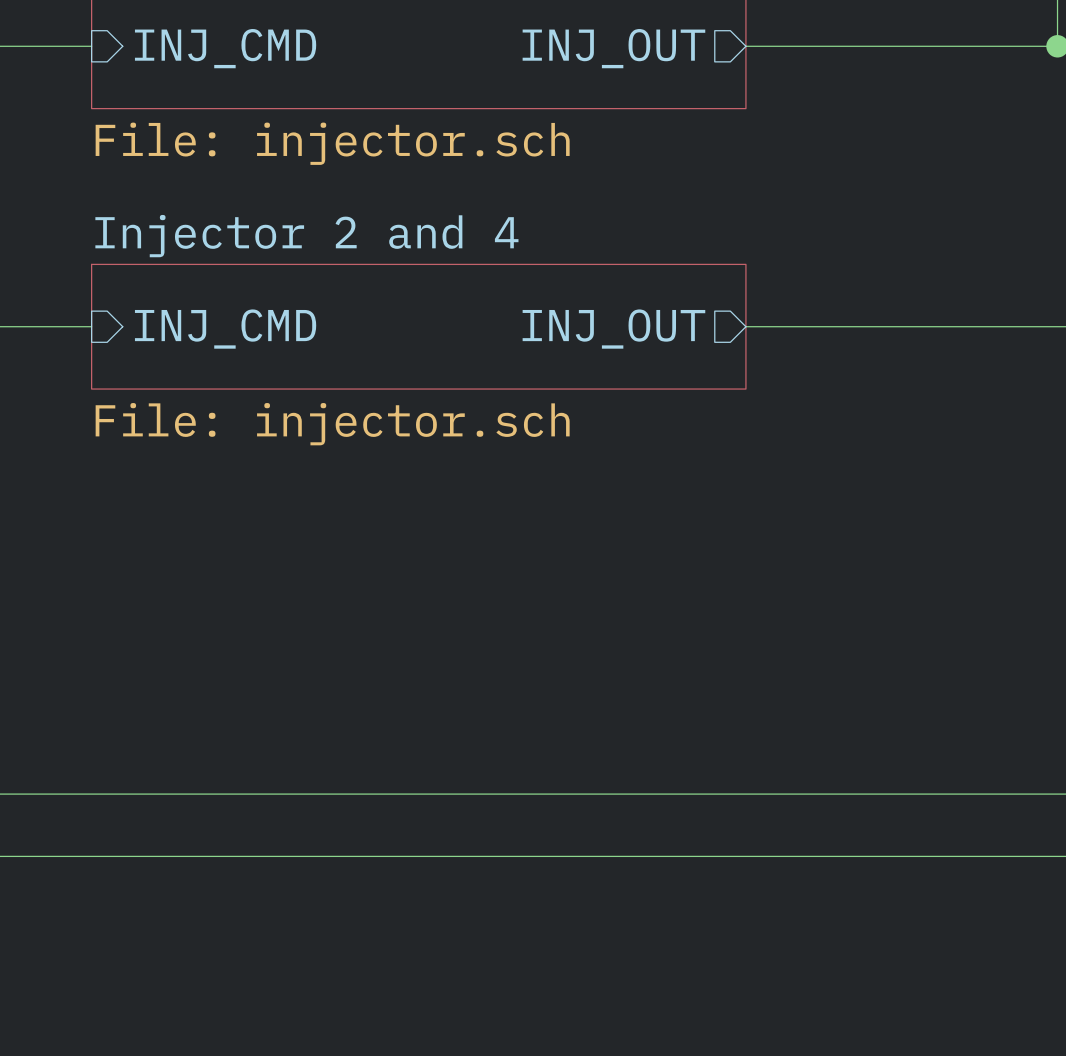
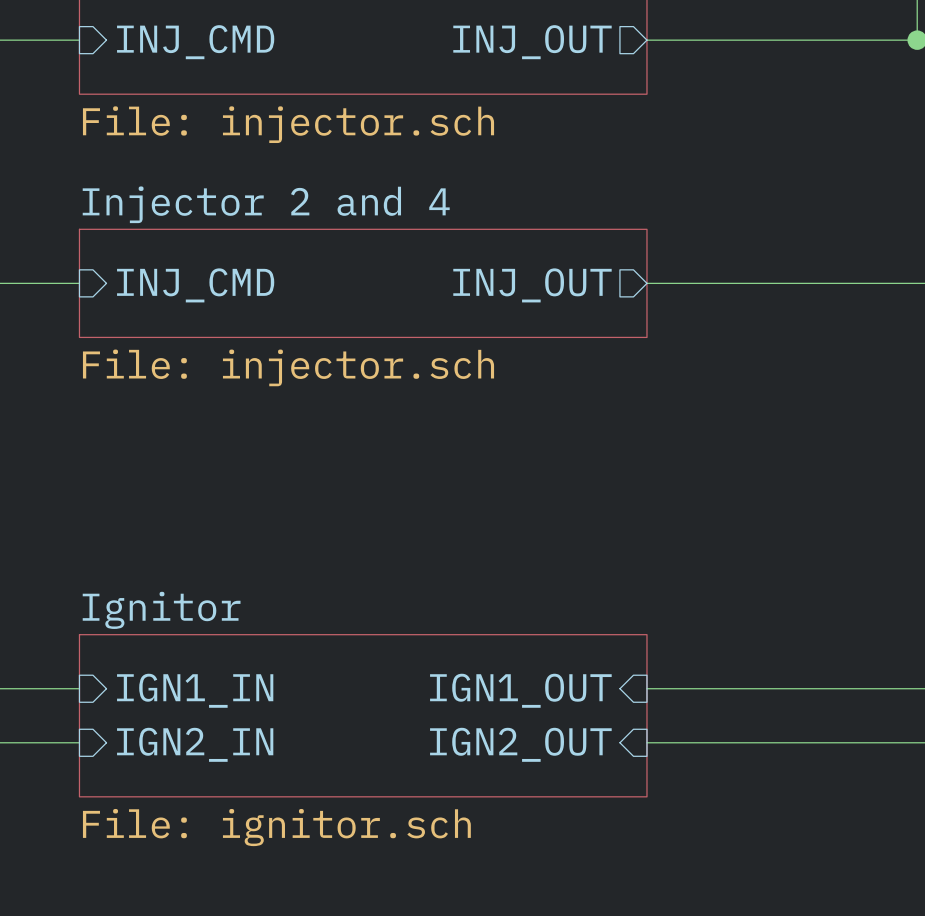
wire: (91, 794) (745, 794) -> none
sheet pin: none -> IGN1_IN (195, 690)
sheet pin: none -> IGN1_OUT (520, 690)
sheet Ignitor: none -> File: ignitor.sch (363, 715)
wire: (91, 856) (745, 856) -> none
sheet pin: none -> IGN2_IN (195, 744)
sheet pin: none -> IGN2_OUT (520, 744)

